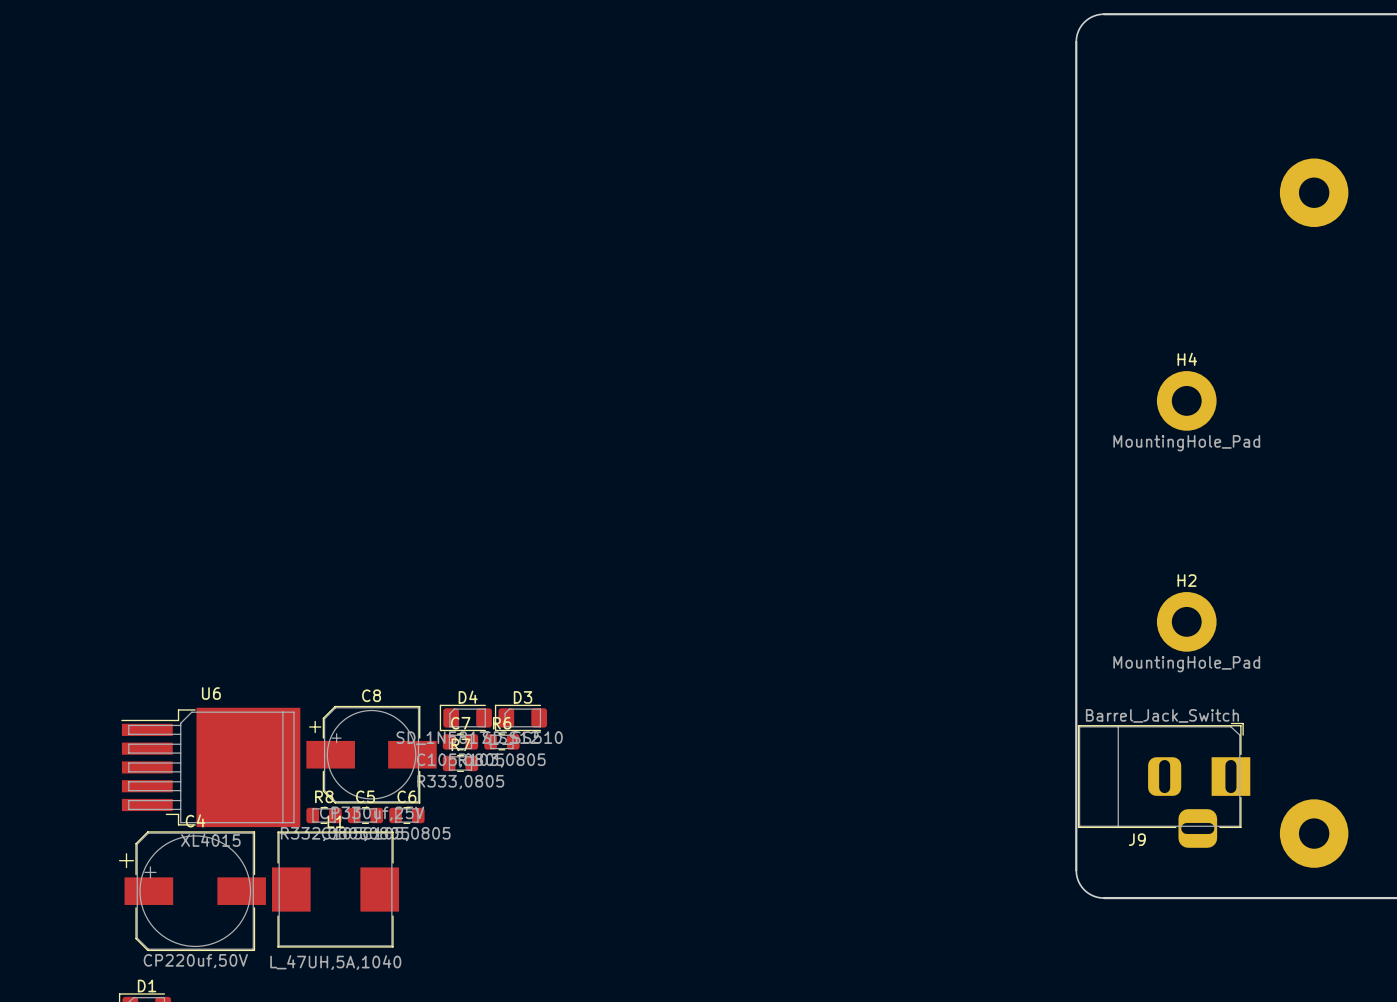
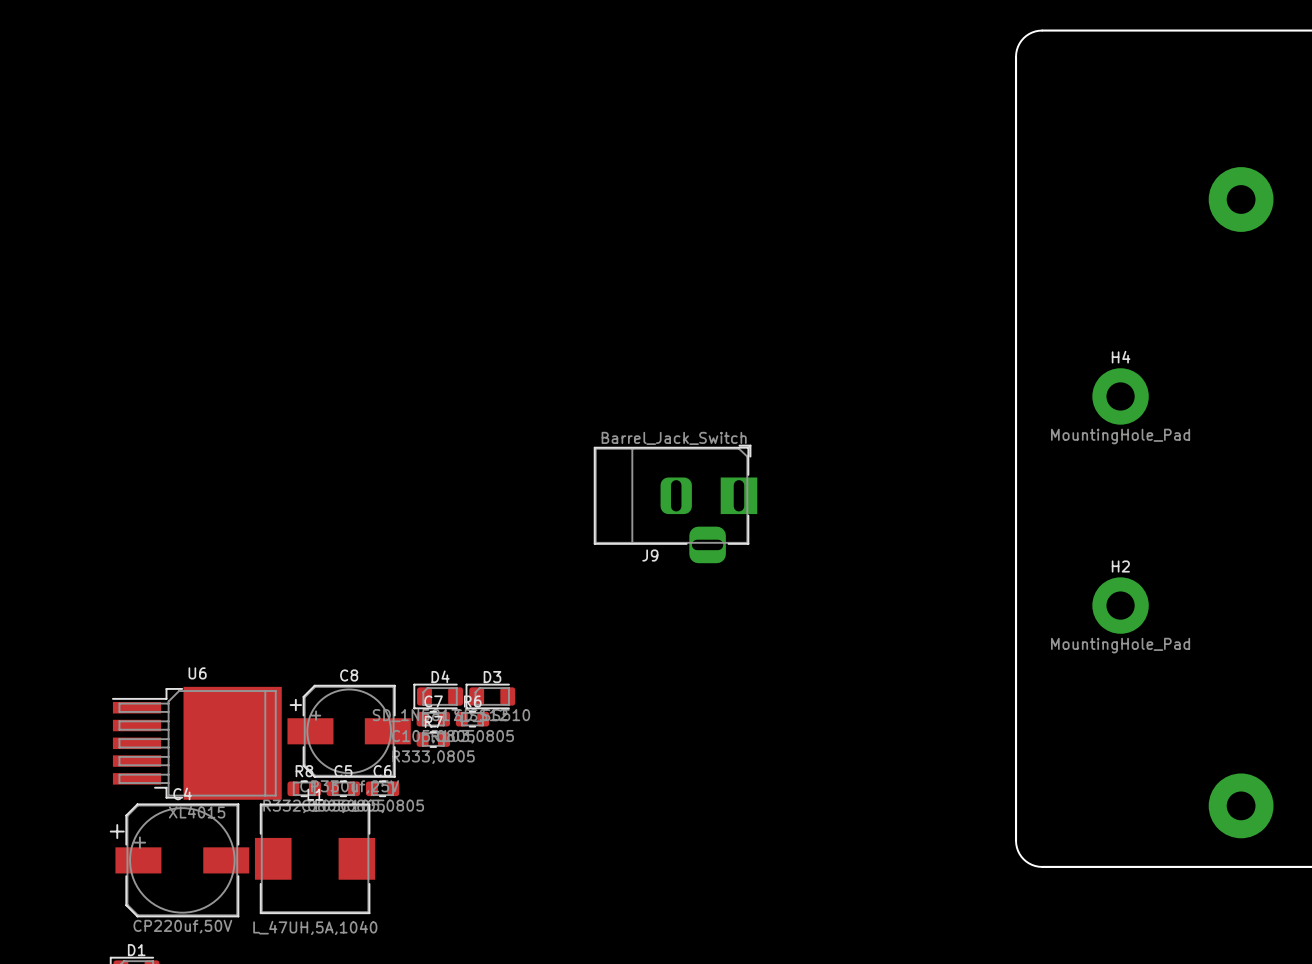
J9 position: (1164, 785) -> (675, 504)

